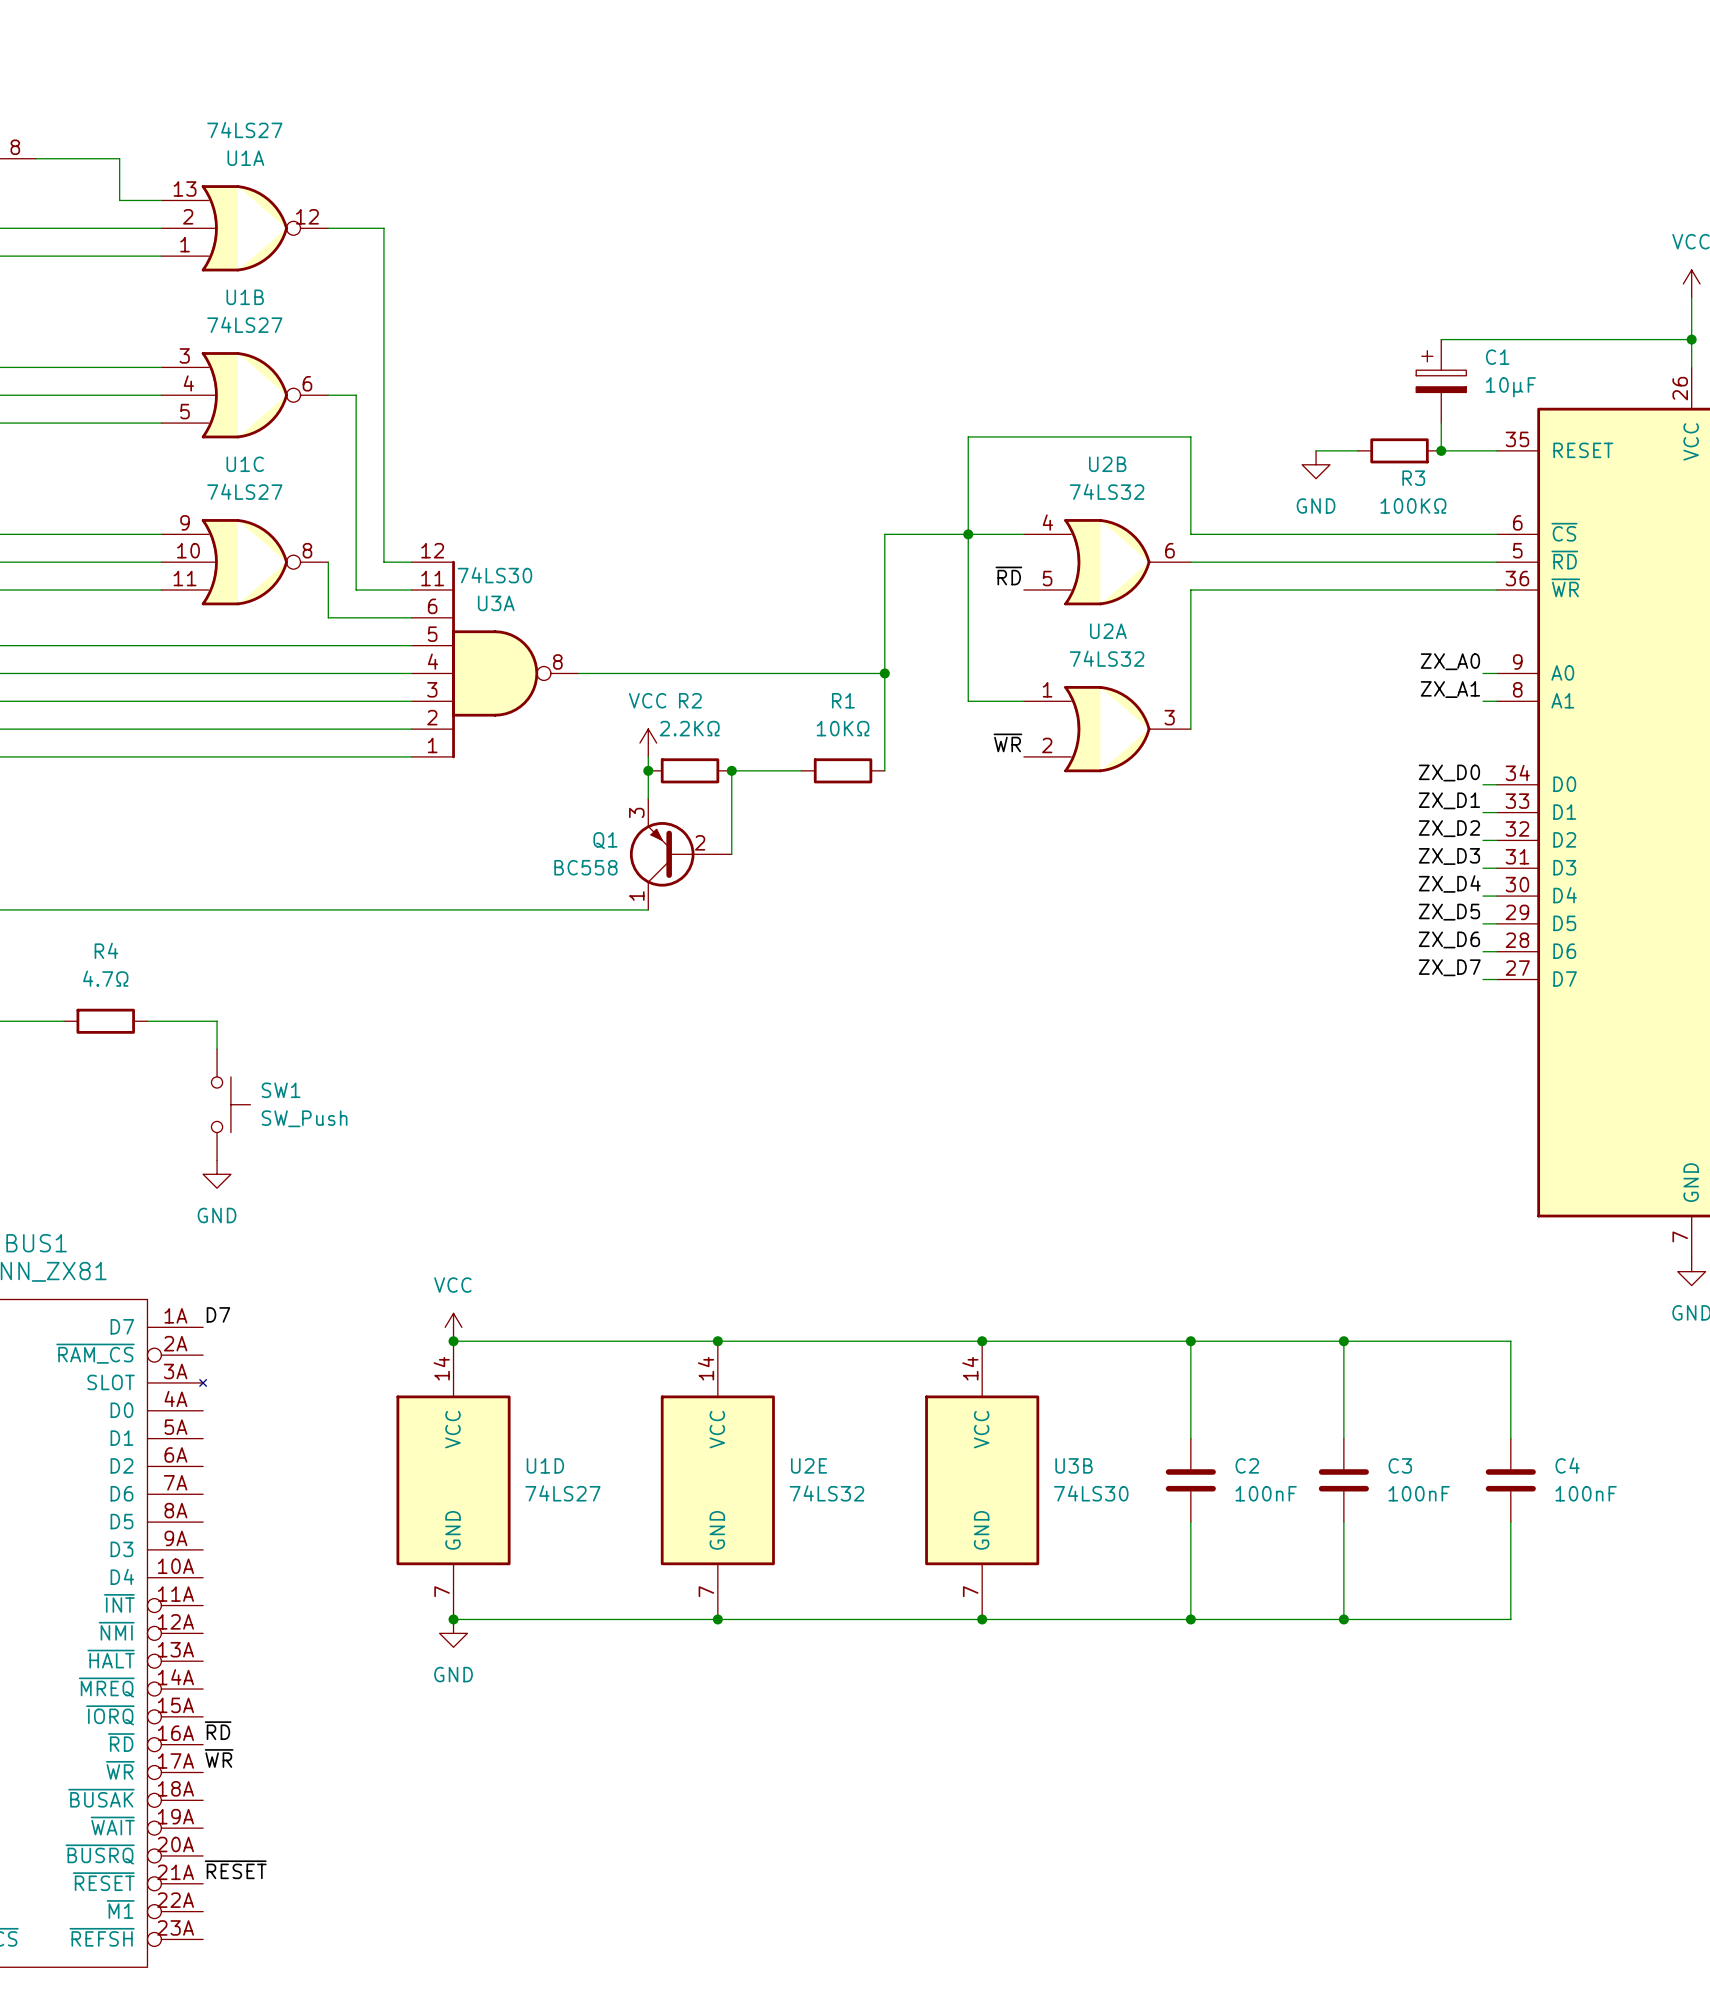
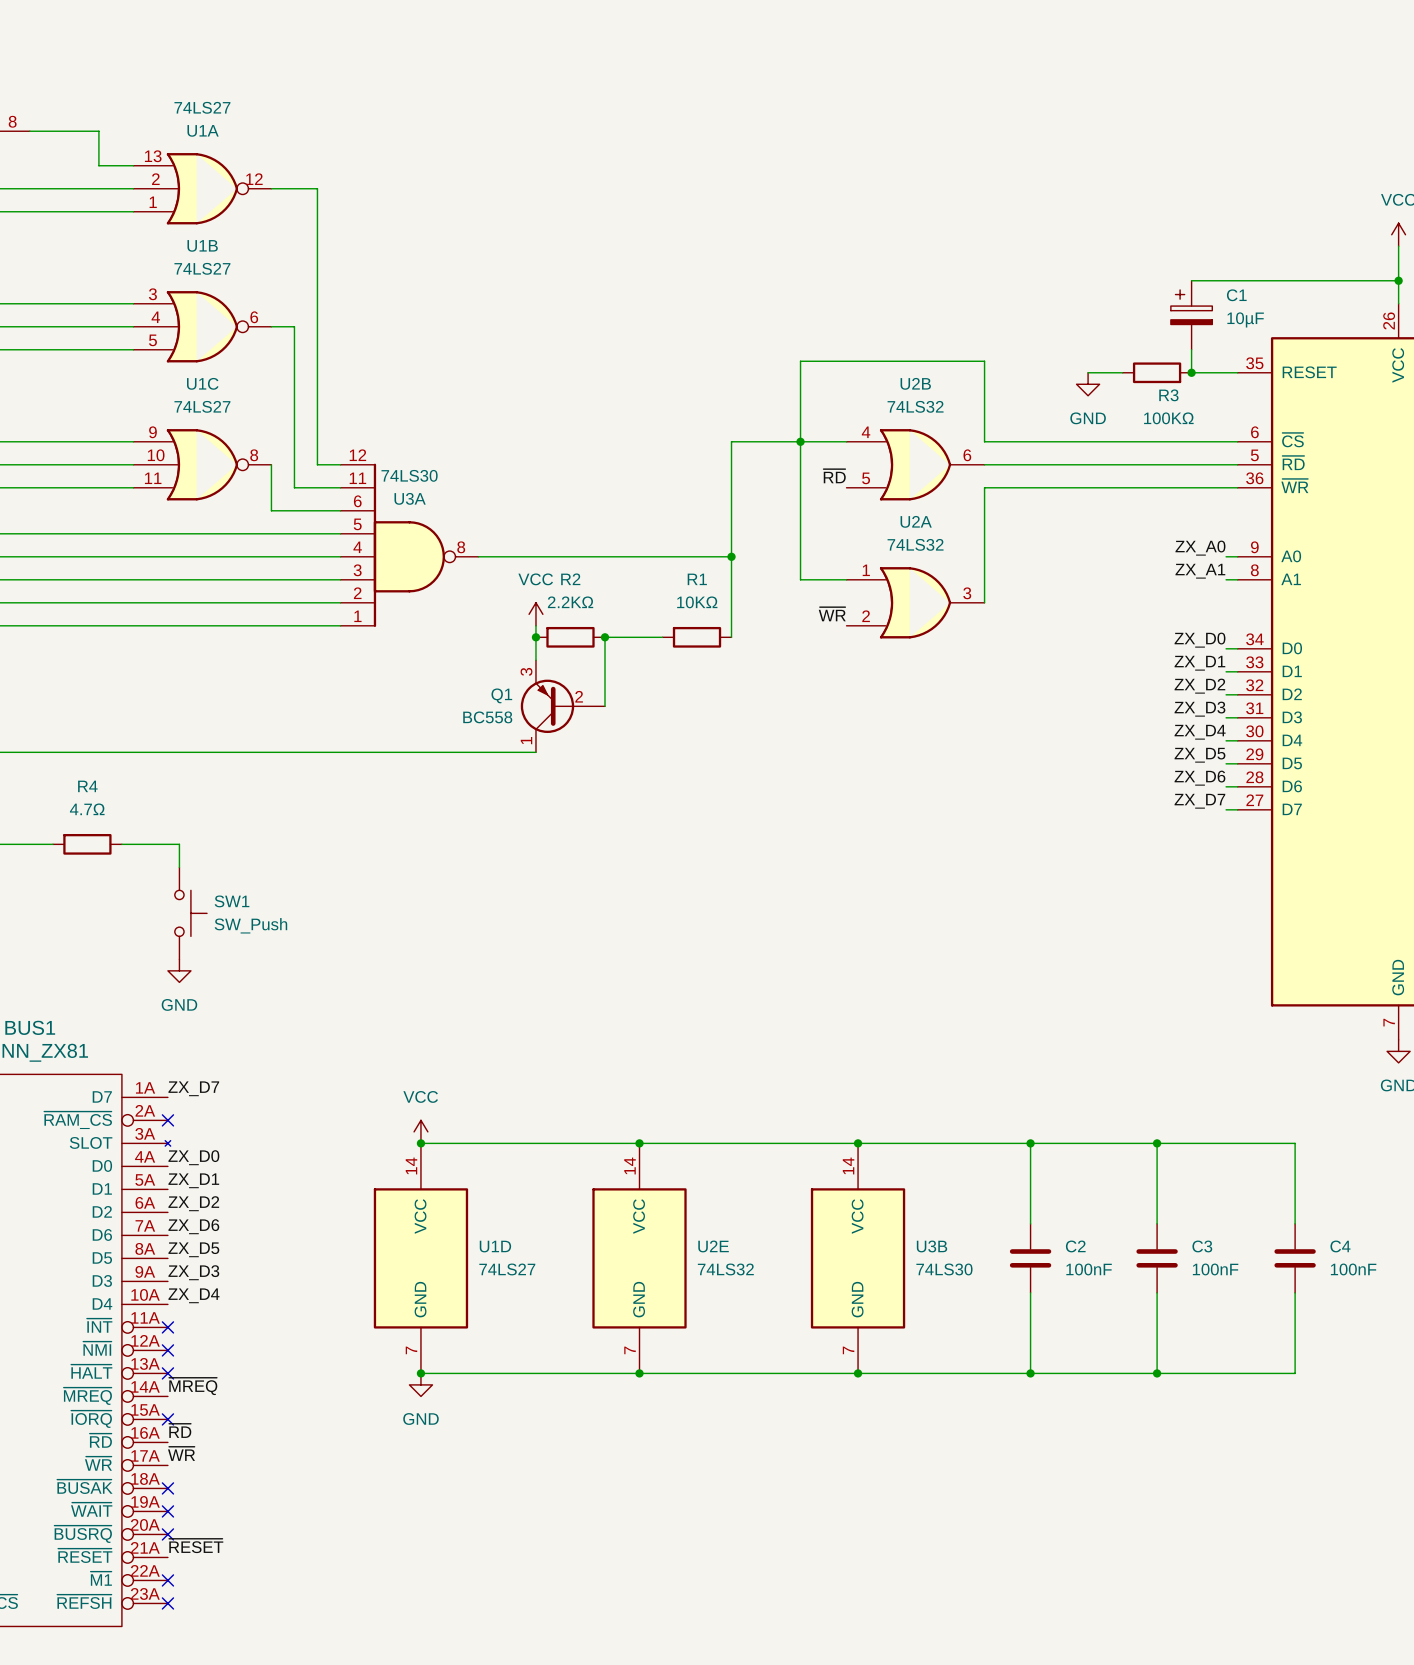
label: D7 (218, 1314) -> ZX_D7 (193, 1088)
power symbol position: VCC (453, 1327) -> VCC (420, 1131)
wire: (453, 1341) (1510, 1341) (1510, 1438) -> (420, 1143) (1295, 1143) (1295, 1223)
junction: (453, 1341) -> none
junction: (717, 1341) -> none
junction: (982, 1341) -> none
wire: (1190, 1341) (1190, 1438) -> (1030, 1143) (1030, 1223)
junction: (1190, 1341) -> none
wire: (1343, 1341) (1343, 1438) -> (1157, 1143) (1157, 1223)
junction: (1343, 1341) -> none
no-connect mark: none -> (167, 1120)
junction: none -> (420, 1143)
junction: none -> (639, 1143)
junction: none -> (858, 1143)
junction: none -> (1030, 1143)
junction: none -> (1157, 1143)
label: none -> ZX_D0 (193, 1157)
label: none -> ZX_D1 (193, 1180)
label: none -> ZX_D2 (193, 1203)
U1D position: (453, 1480) -> (420, 1258)
U2E position: (717, 1480) -> (639, 1258)
U3B position: (982, 1480) -> (858, 1258)
C2 position: (1190, 1480) -> (1030, 1258)
C3 position: (1343, 1480) -> (1157, 1258)
C4 position: (1510, 1480) -> (1295, 1258)
label: none -> ZX_D6 (193, 1226)
label: none -> ZX_D5 (193, 1249)
wire: (1190, 1522) (1190, 1619) -> (1030, 1292) (1030, 1373)
wire: (1343, 1522) (1343, 1619) -> (1157, 1292) (1157, 1373)
wire: (1510, 1522) (1510, 1619) (453, 1619) -> (1295, 1292) (1295, 1373) (420, 1373)
label: none -> ZX_D3 (193, 1272)
label: none -> ZX_D4 (193, 1295)
no-connect mark: none -> (167, 1327)
junction: (453, 1619) -> none
junction: (717, 1619) -> none
junction: (982, 1619) -> none
junction: (1190, 1619) -> none
junction: (1343, 1619) -> none
no-connect mark: none -> (167, 1350)
power symbol position: GND (453, 1633) -> GND (420, 1384)
no-connect mark: none -> (167, 1373)
junction: none -> (420, 1373)
junction: none -> (639, 1373)
junction: none -> (858, 1373)
junction: none -> (1030, 1373)
junction: none -> (1157, 1373)
label: none -> ~{MREQ} (193, 1386)
no-connect mark: none -> (167, 1419)
no-connect mark: none -> (167, 1488)
no-connect mark: none -> (167, 1511)
no-connect mark: none -> (167, 1534)
no-connect mark: none -> (167, 1580)
no-connect mark: none -> (167, 1603)

